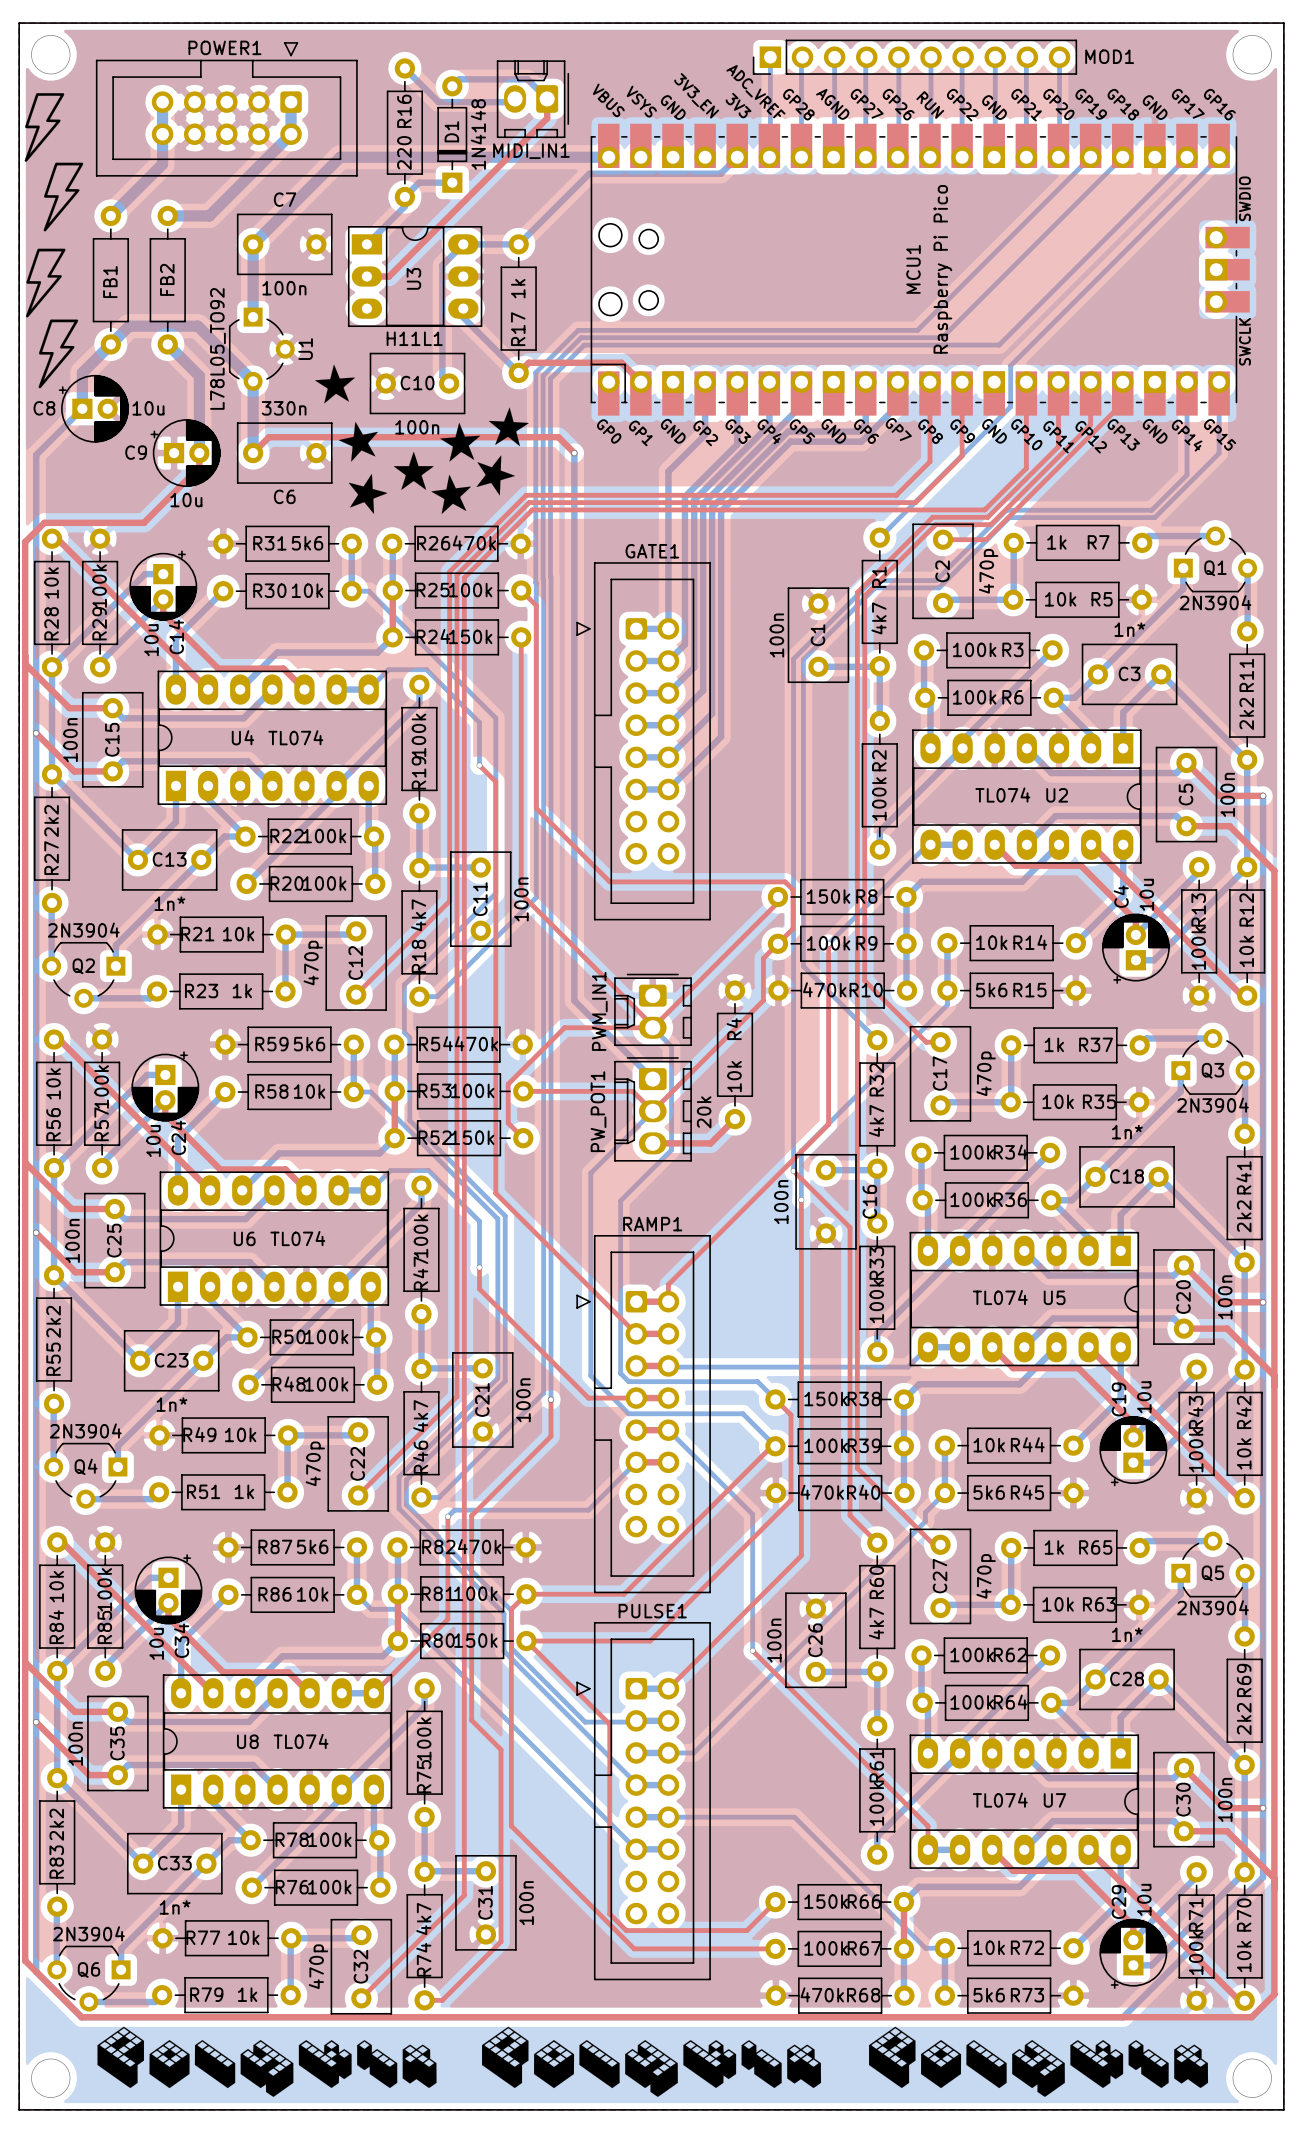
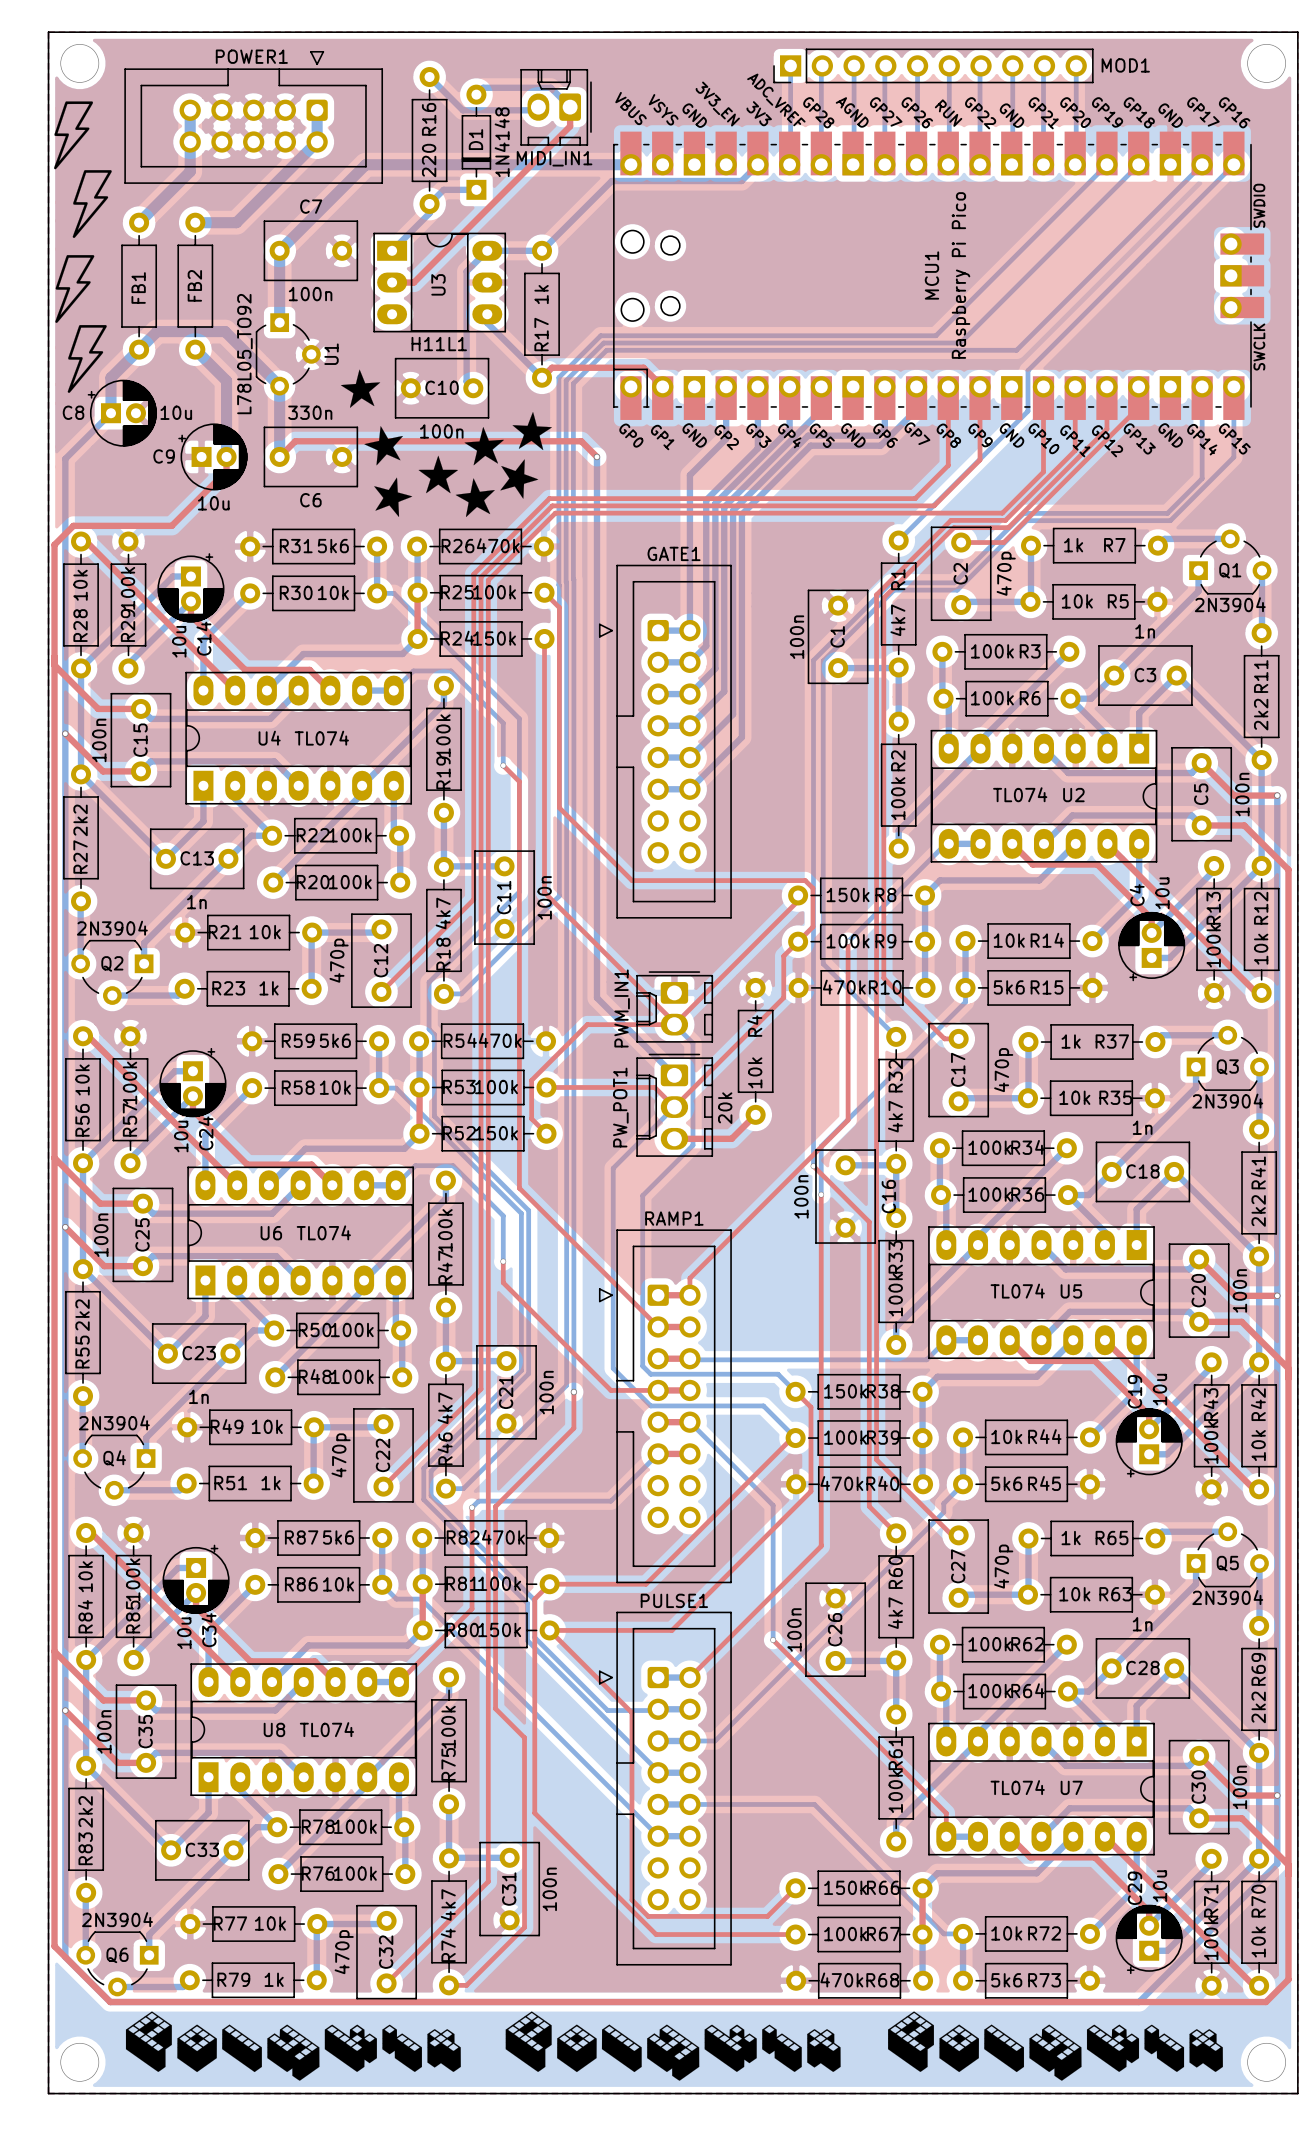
C3 value: 1n* (1129, 629) -> 1n (1145, 631)
C13 value: 1n* (169, 903) -> 1n (196, 902)
C18 value: 1n* (1127, 1132) -> 1n (1142, 1127)
C23 value: 1n* (171, 1404) -> 1n (198, 1396)
C28 value: 1n* (1127, 1634) -> 1n (1142, 1624)
C33 value: 1n* (175, 1907) -> none

